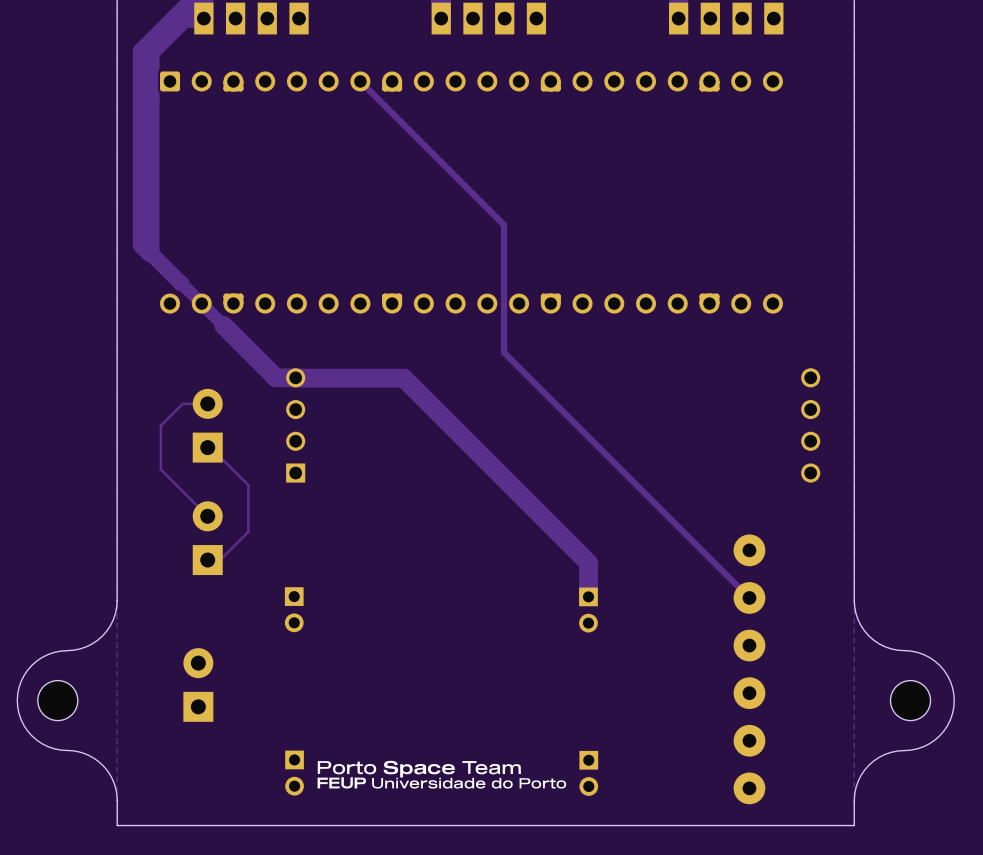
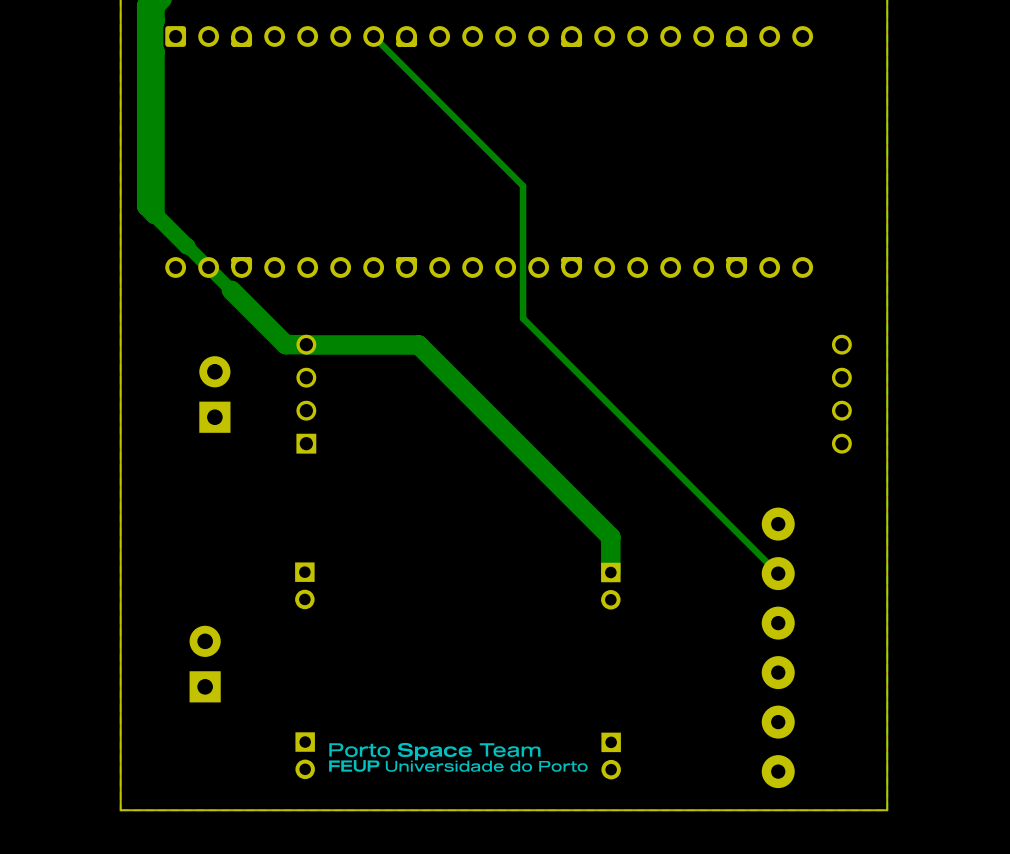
track: (207, 403) (182, 403) (160, 425) (160, 469) (207, 516) -> none
track: (207, 447) (210, 447) (248, 485) (248, 531) (220, 560) (207, 560) -> none
part: (207, 538) -> none
board edge: (117, 600) (113, 619) (102, 635) (86, 646) (67, 650) -> none
board edge: (854, 600) (858, 619) (864, 631) (873, 640) (891, 648) (923, 654) (939, 665) (950, 681) (954, 700) (950, 719) (939, 735) (923, 746) (891, 752) (873, 760) (860, 775) (855, 787) (854, 800) -> (887, 576) (887, 784)
board edge: (67, 650) (54, 652) (42, 657) (27, 670) (18, 687) (17, 700) (18, 713) (27, 730) (42, 743) (54, 748) (83, 753) (98, 761) (106, 769) (115, 789) (117, 825) -> (120, 576) (120, 810)
part: (57, 700) -> none
part: (910, 700) -> none

